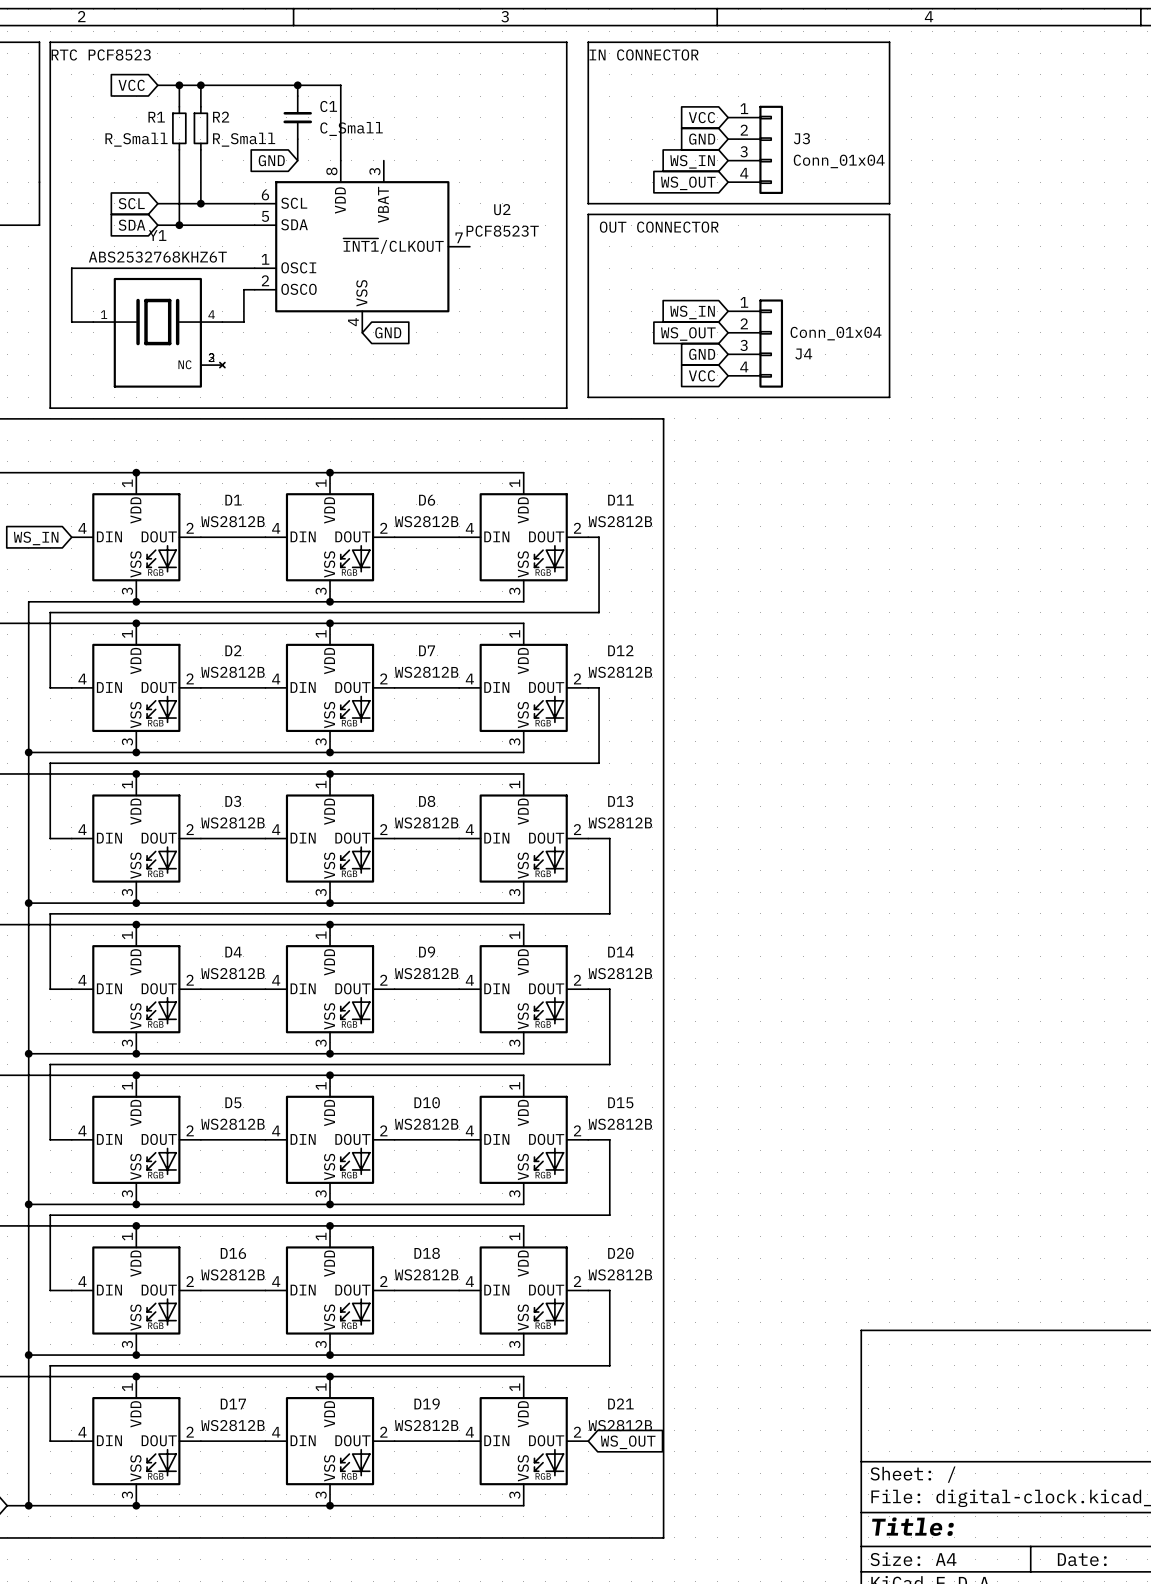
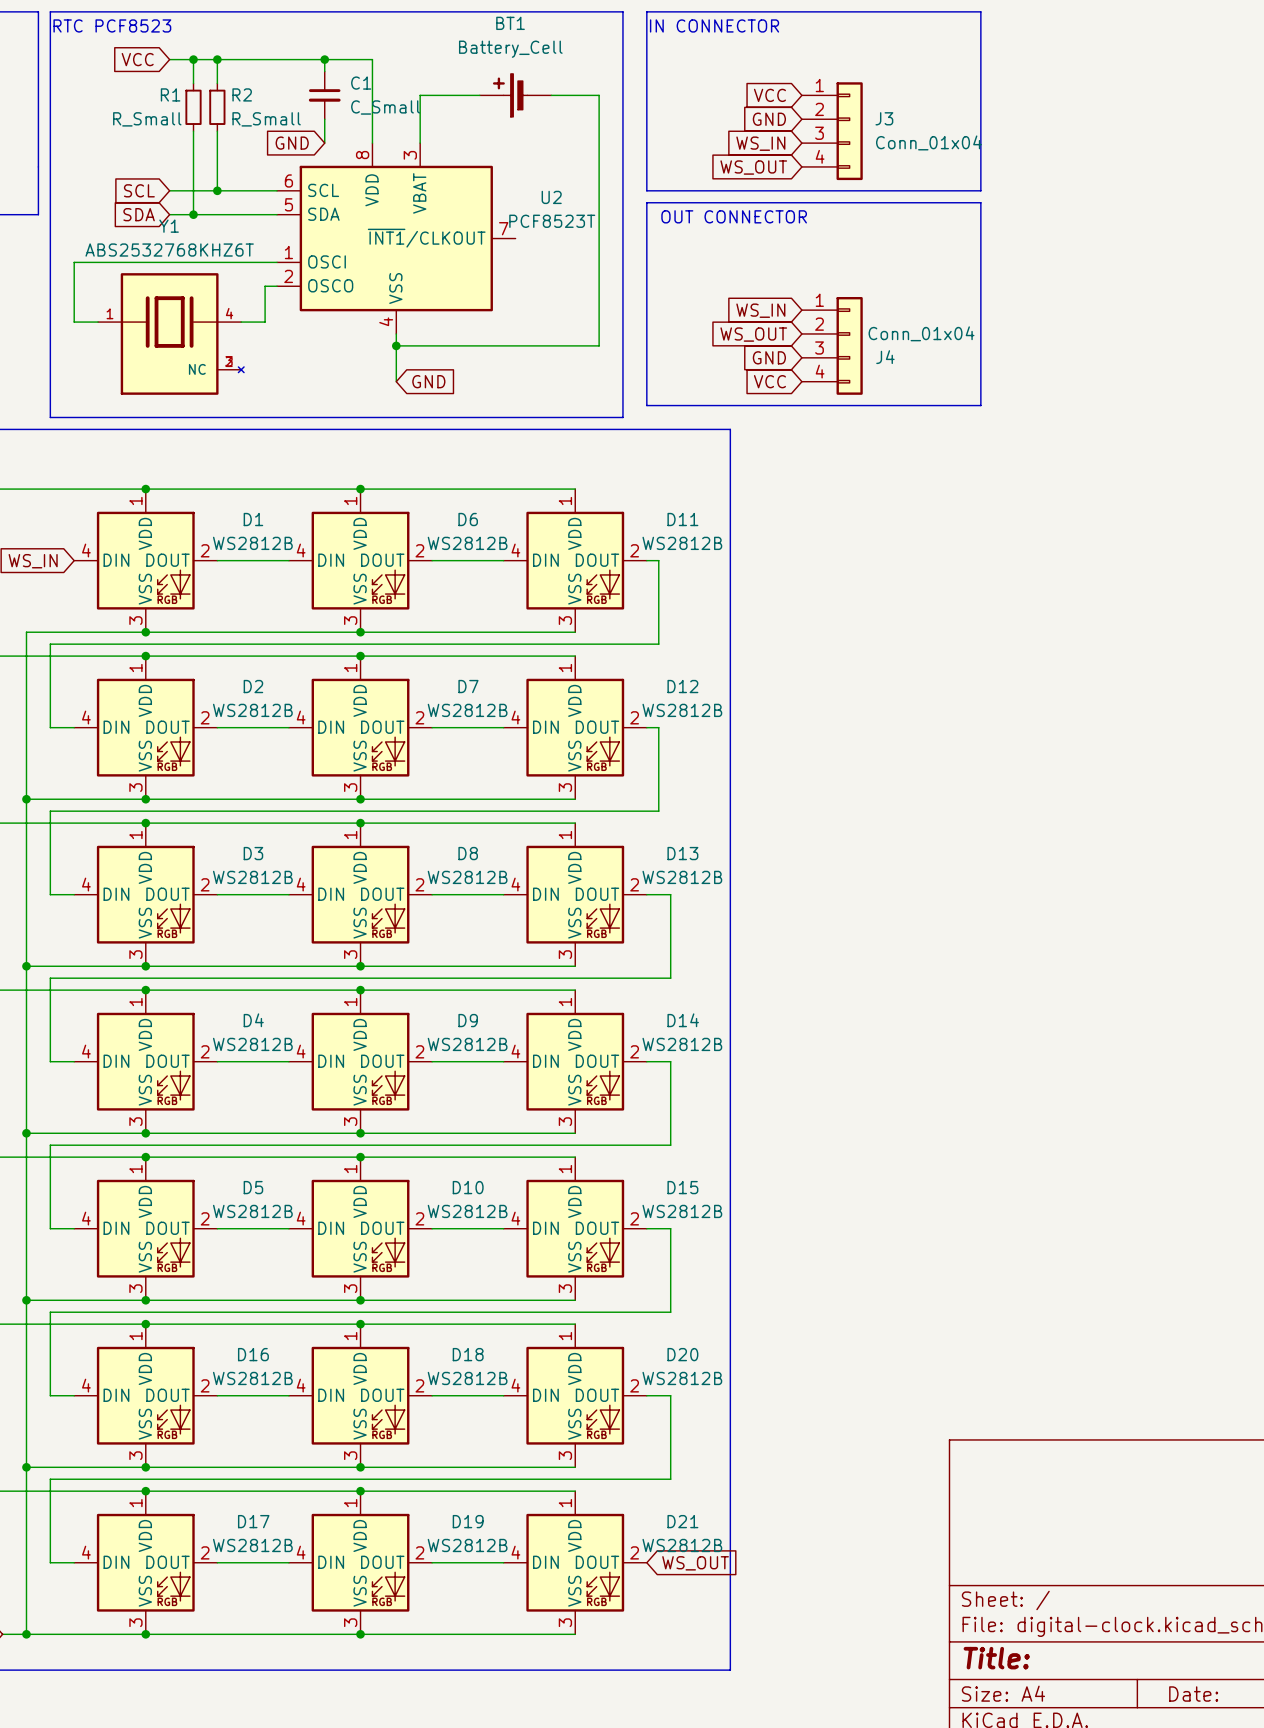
wire: none -> (479, 95) (420, 95) (420, 143)
BT1: none -> Battery_Cell (515, 95)
wire: none -> (551, 95) (599, 95) (599, 345) (396, 345)
wire: none -> (396, 333) (396, 381)
global label position: GND (388, 332) -> GND (428, 381)
junction: none -> (396, 345)

